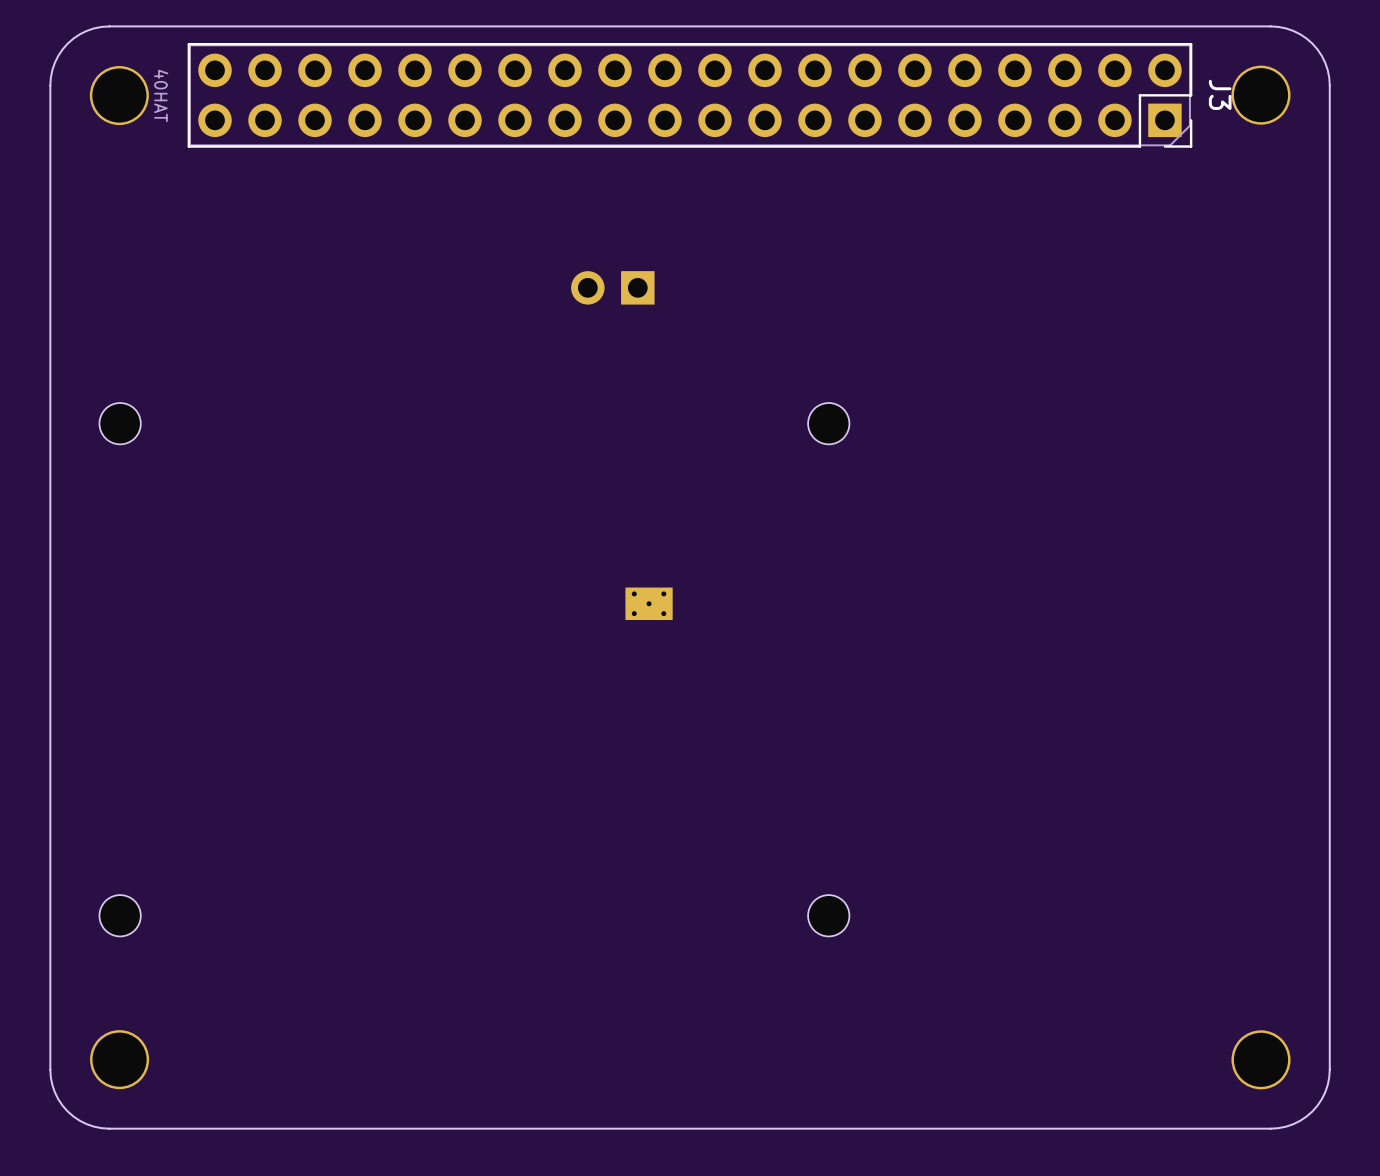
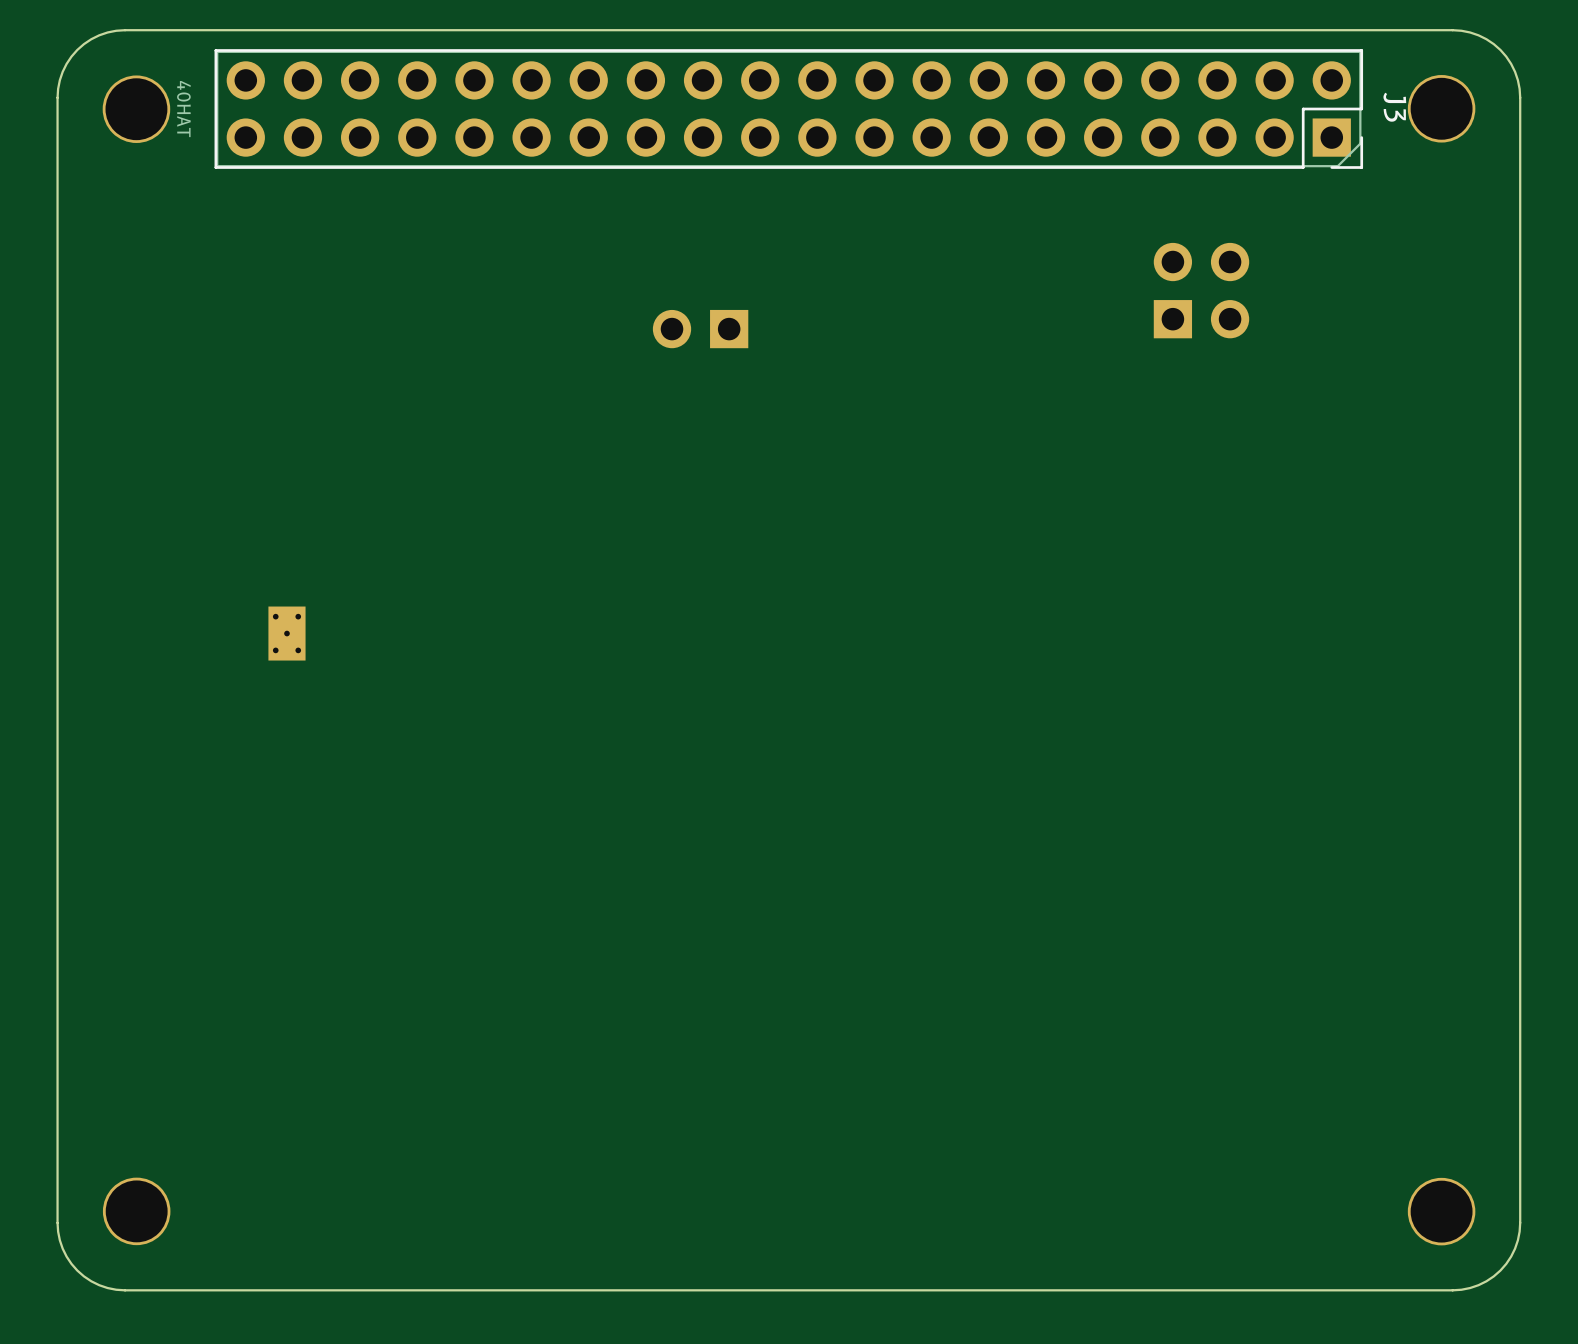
part: none -> (1201, 290)
part: (120, 423) -> none
part: (828, 423) -> none
part rotation: 0° (649, 603) -> 90° clockwise (286, 633)
part position: (649, 603) -> (286, 633)
part: (120, 915) -> none
part: (828, 915) -> none

